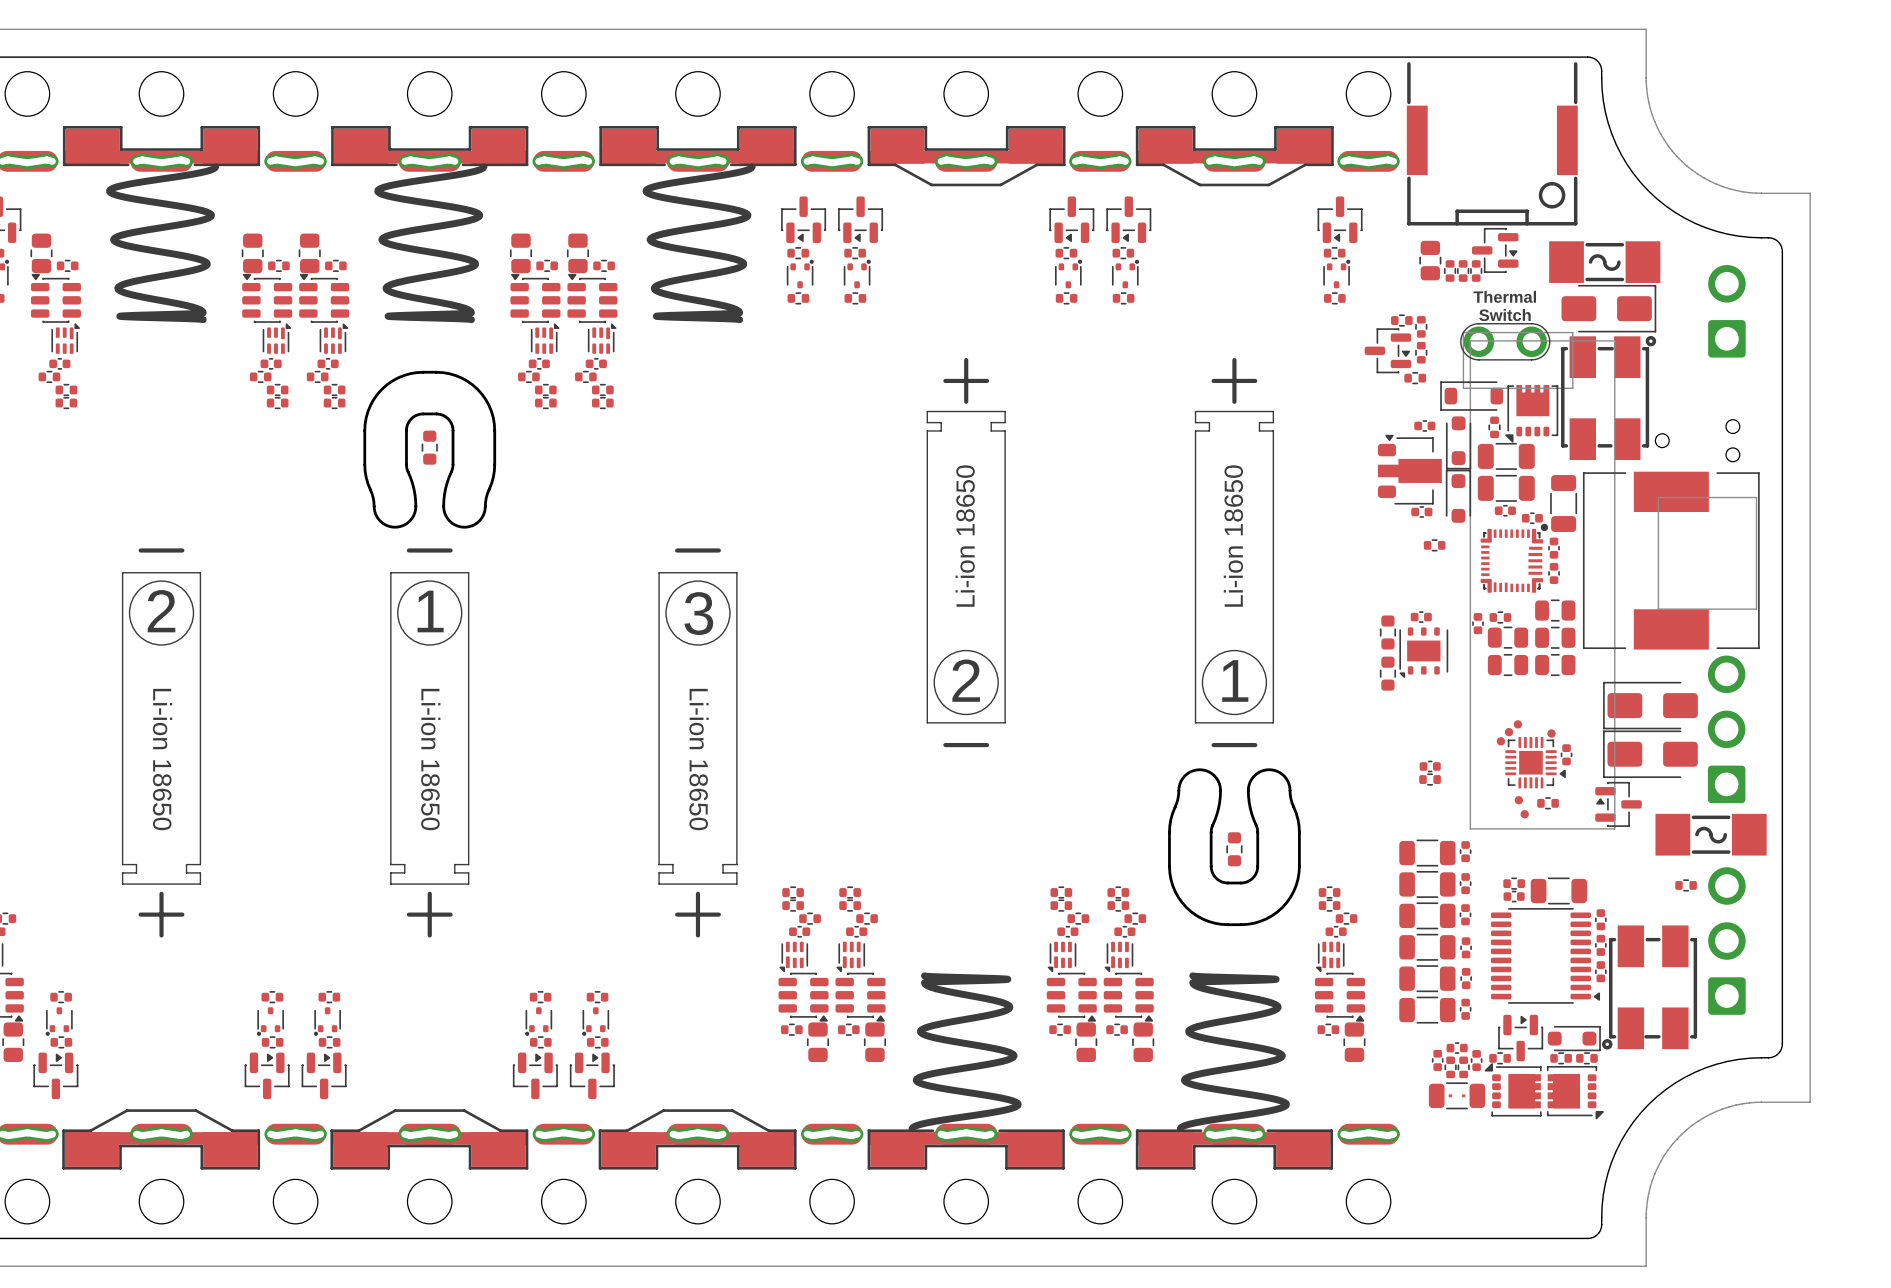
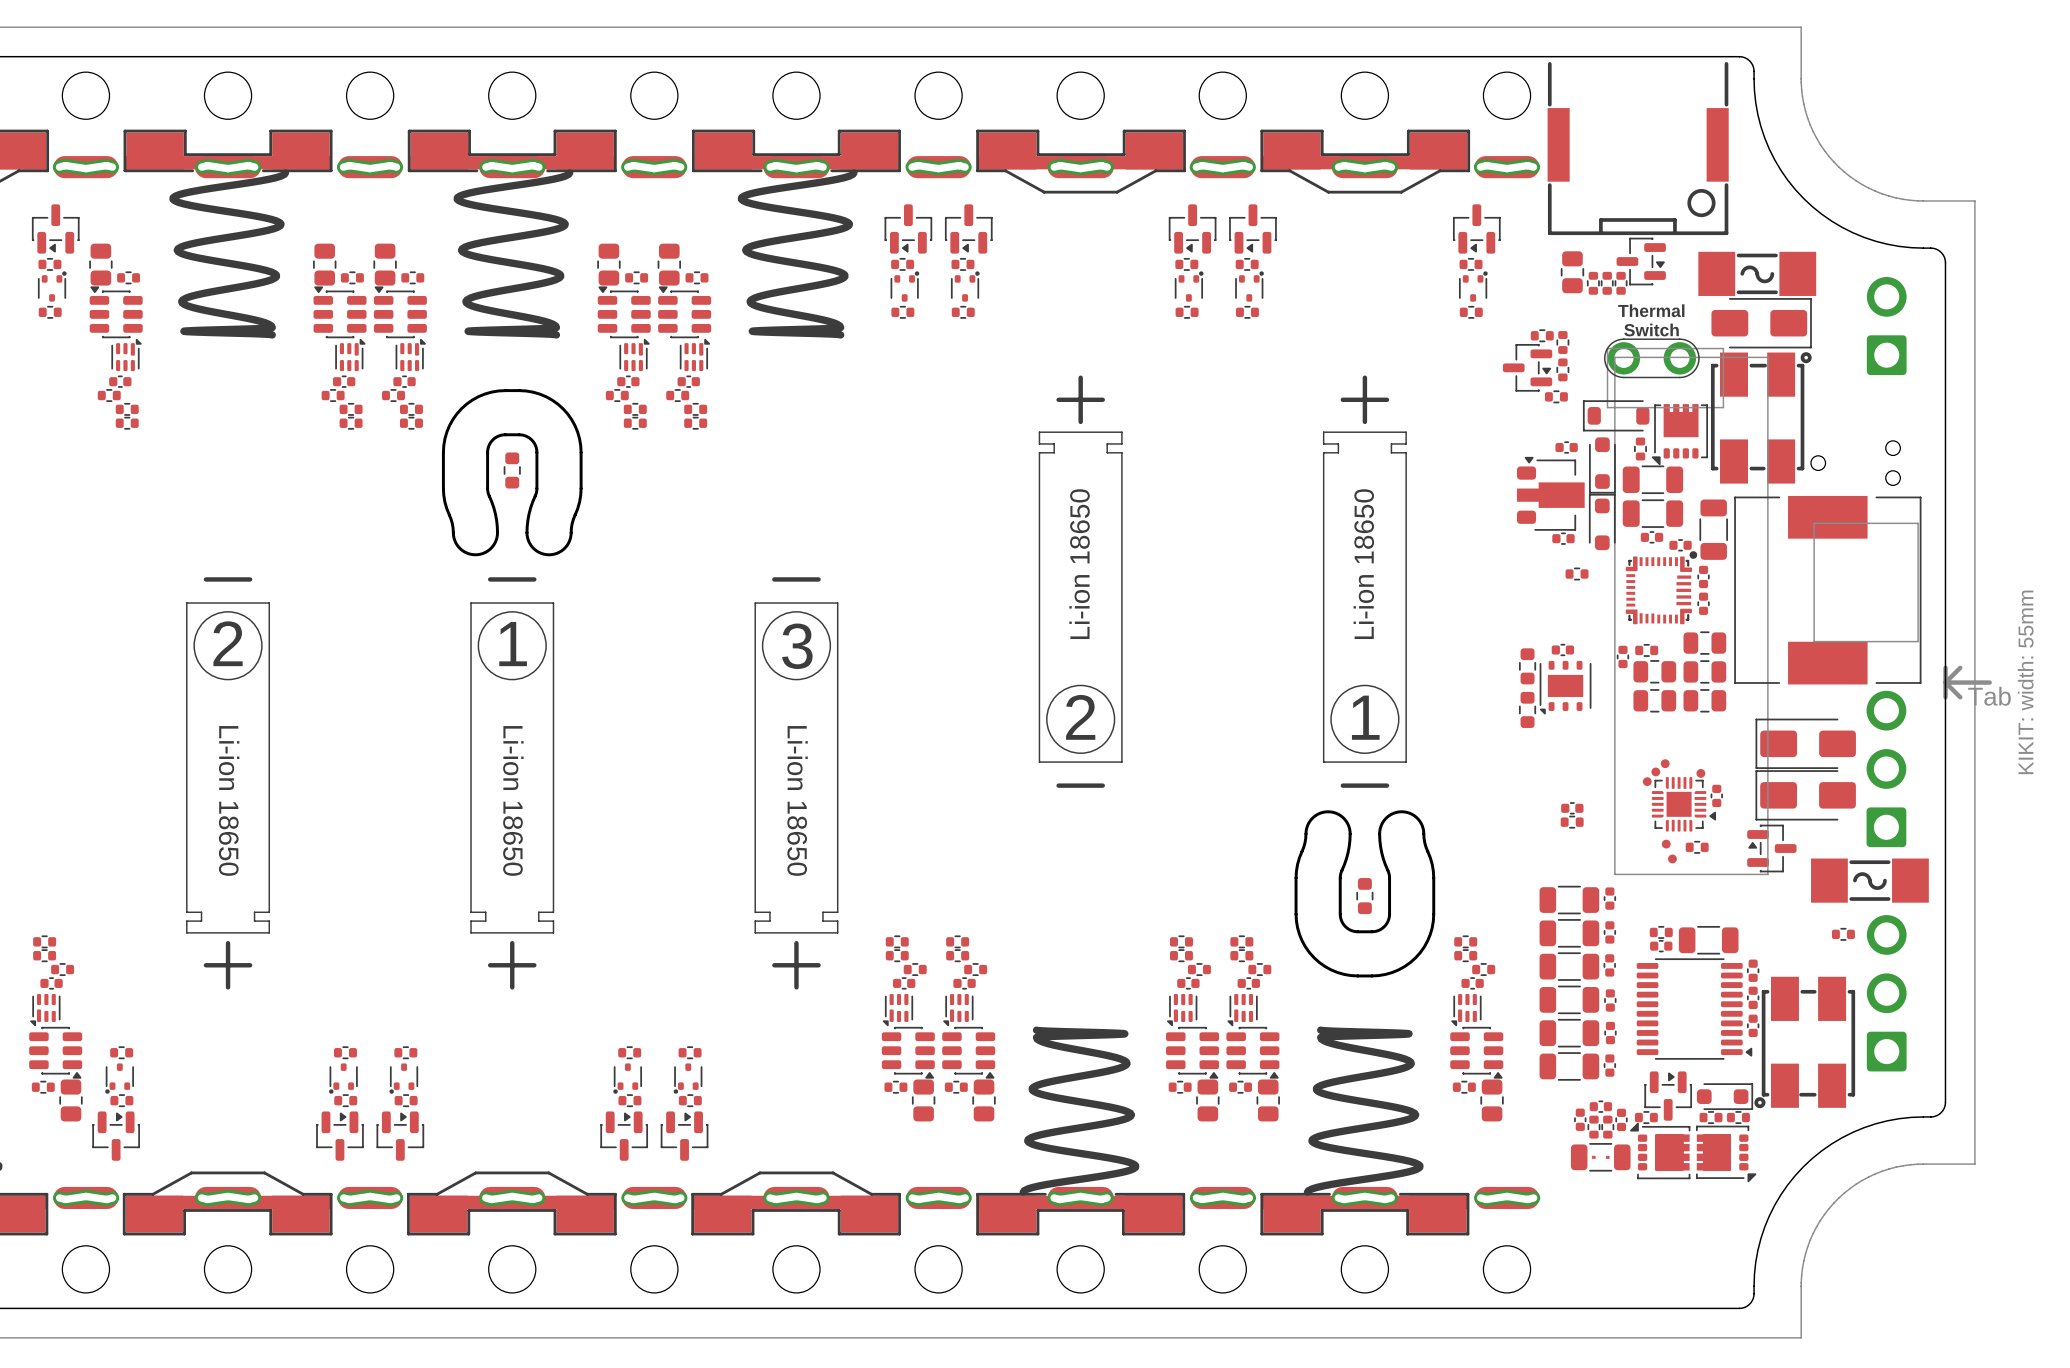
drawing: none -> [1943, 665, 1992, 700]

